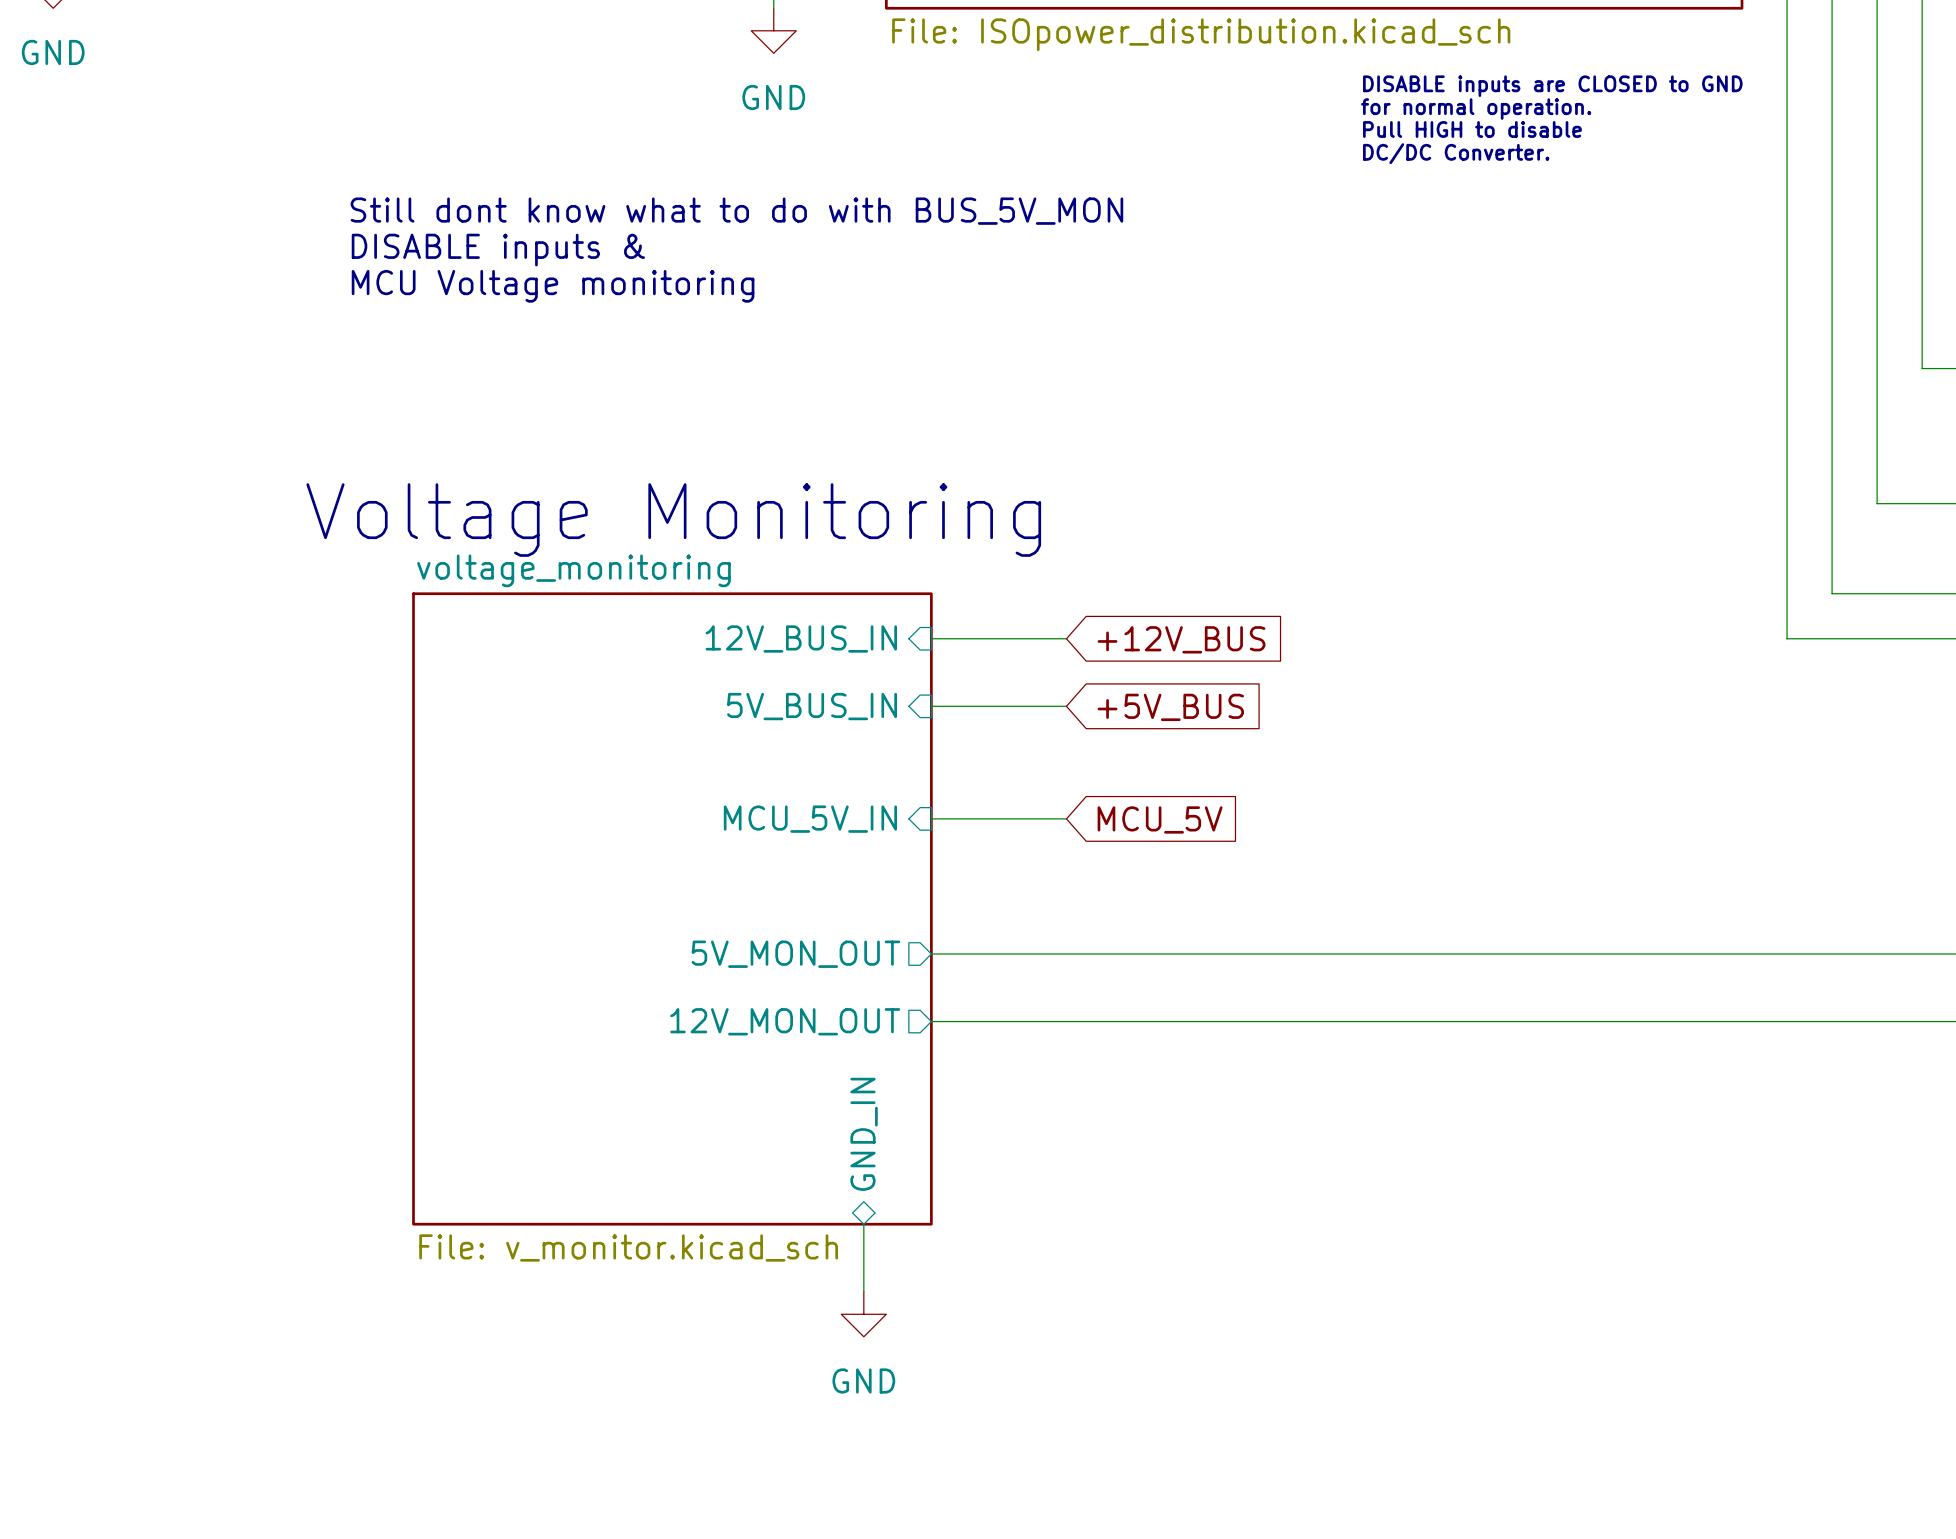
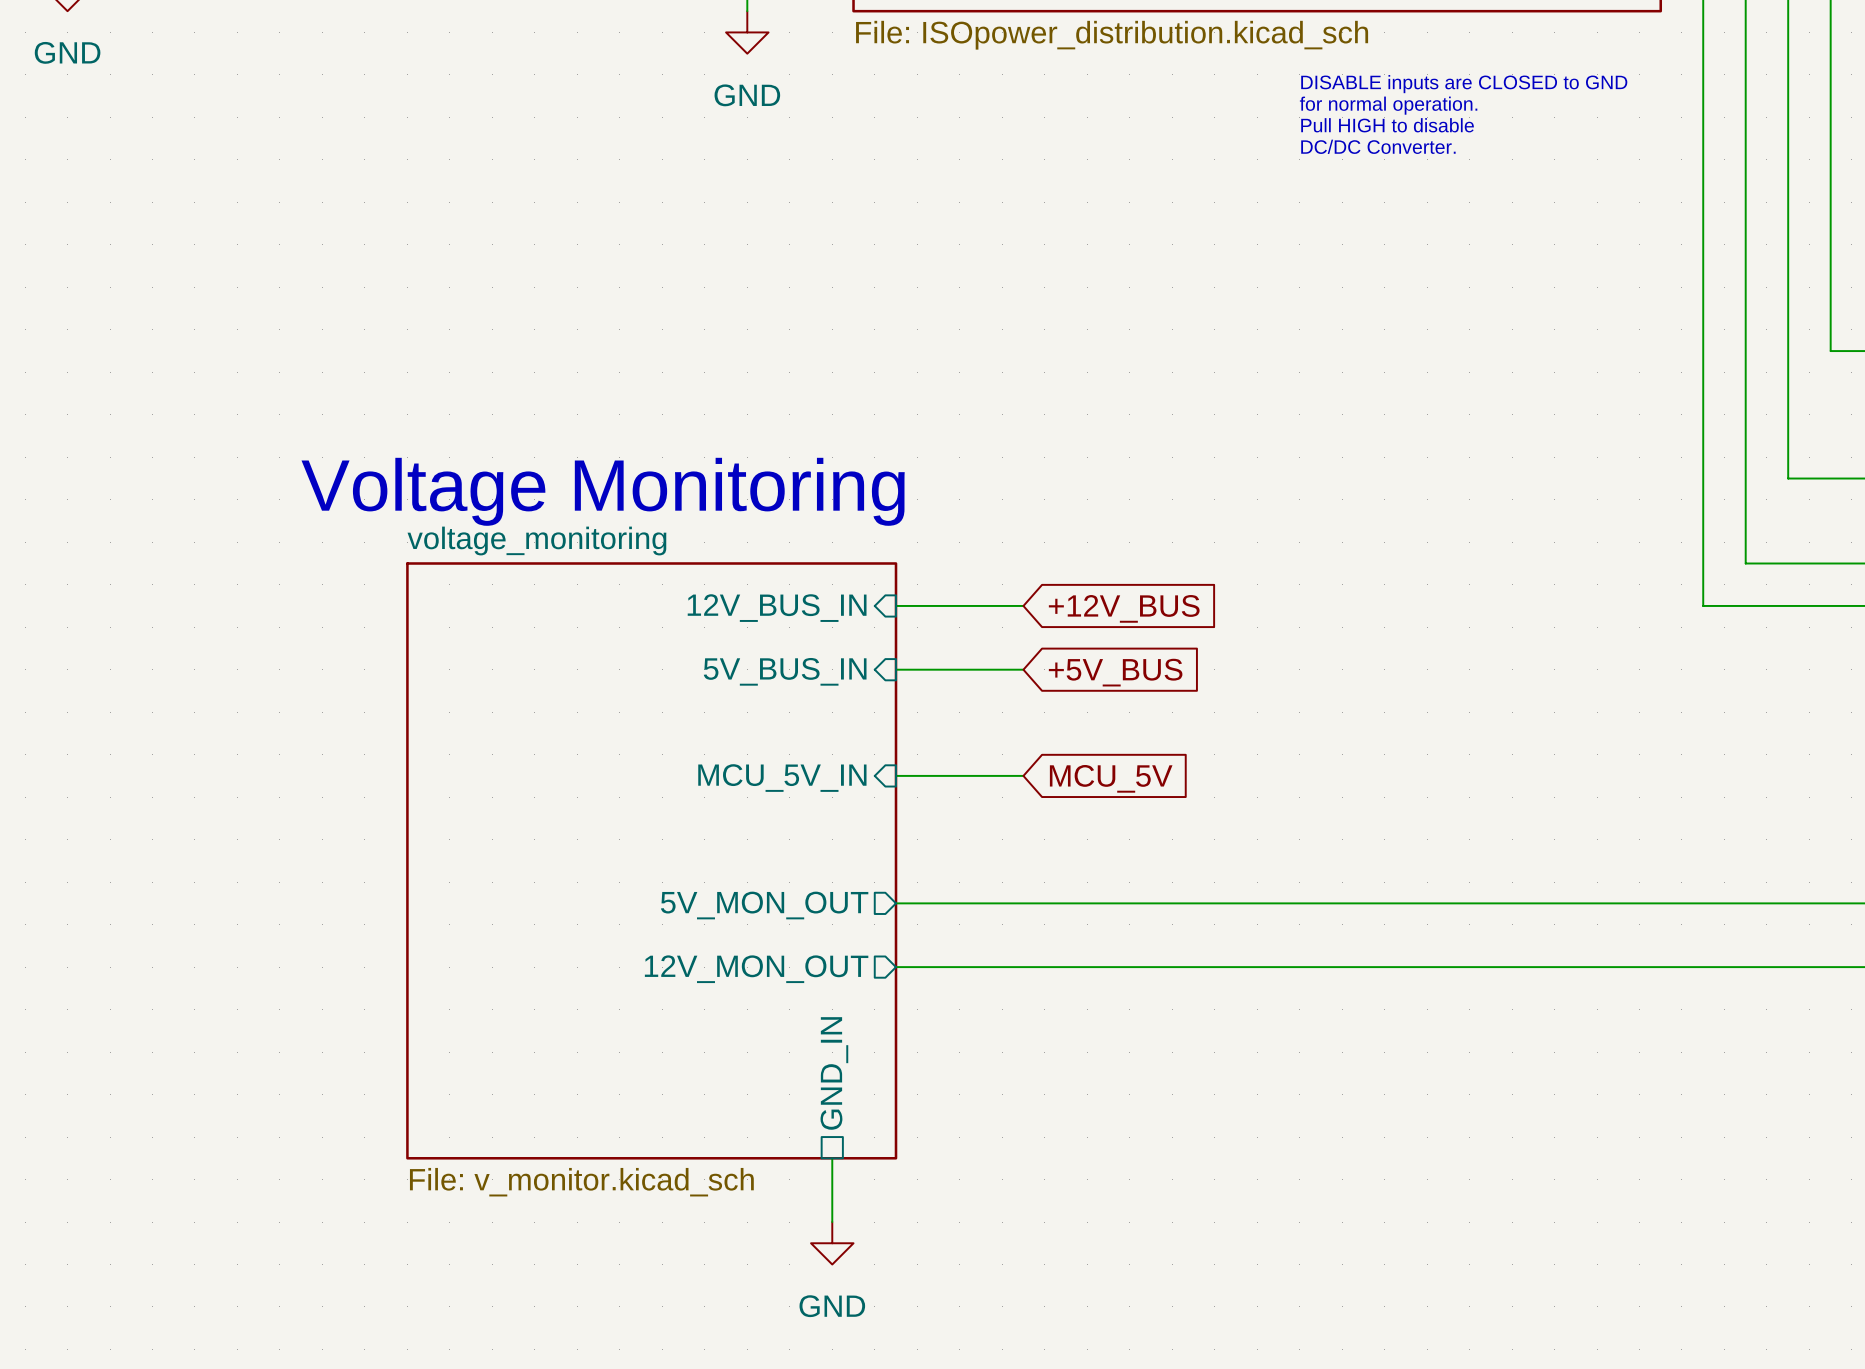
text: Still dont know what to do with BUS_5V_MON (736, 211) -> none
text: DISABLE inputs & (498, 250) -> none
text: MCU Voltage monitoring (553, 286) -> none
sheet pin shape: bidirectional (864, 1134) -> passive (834, 1073)

